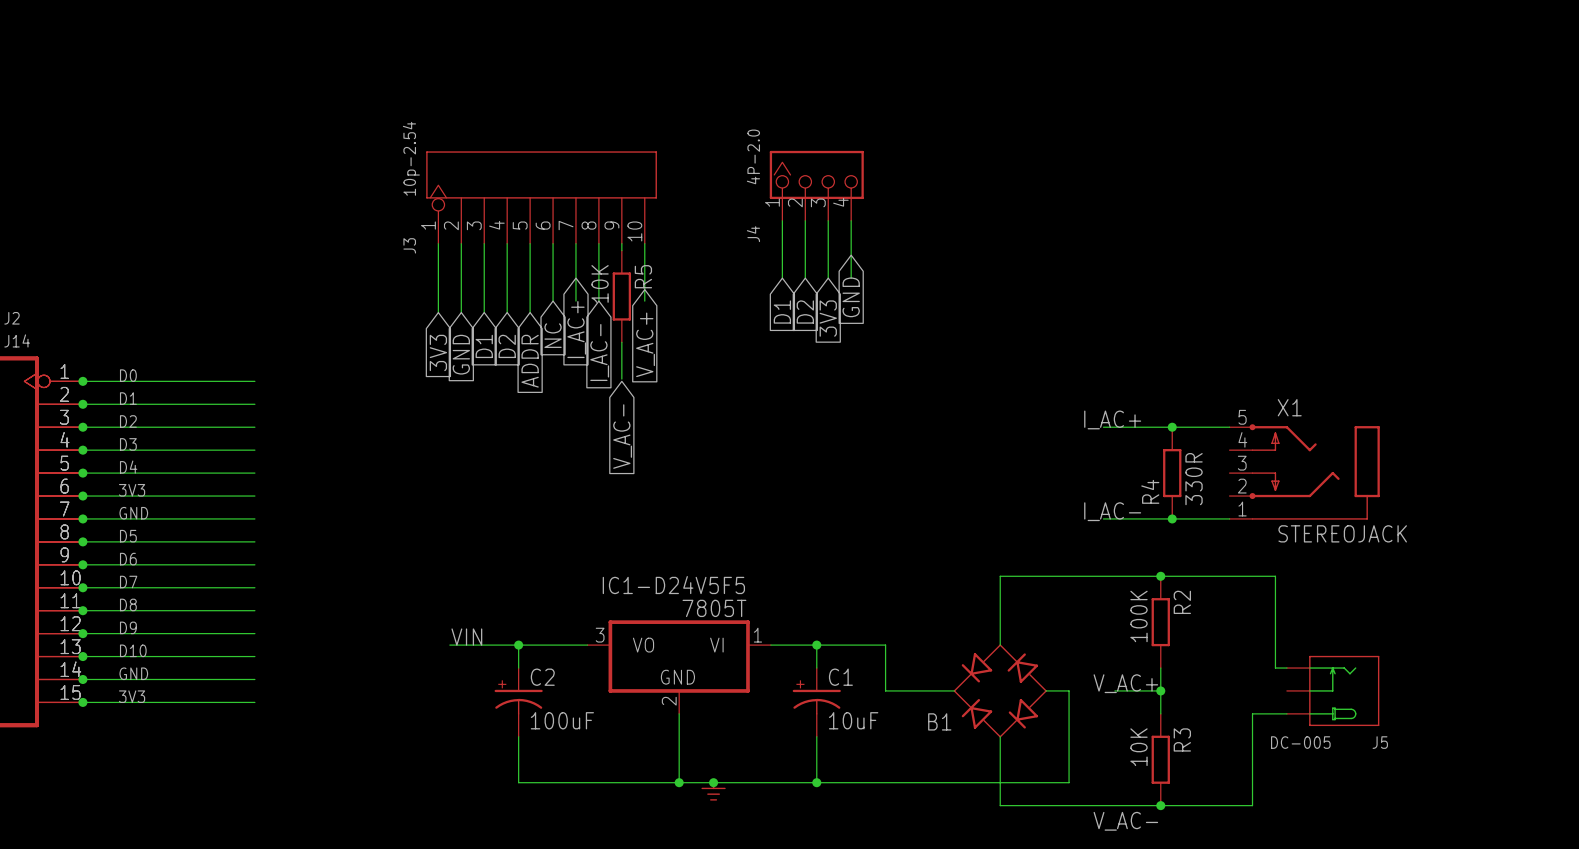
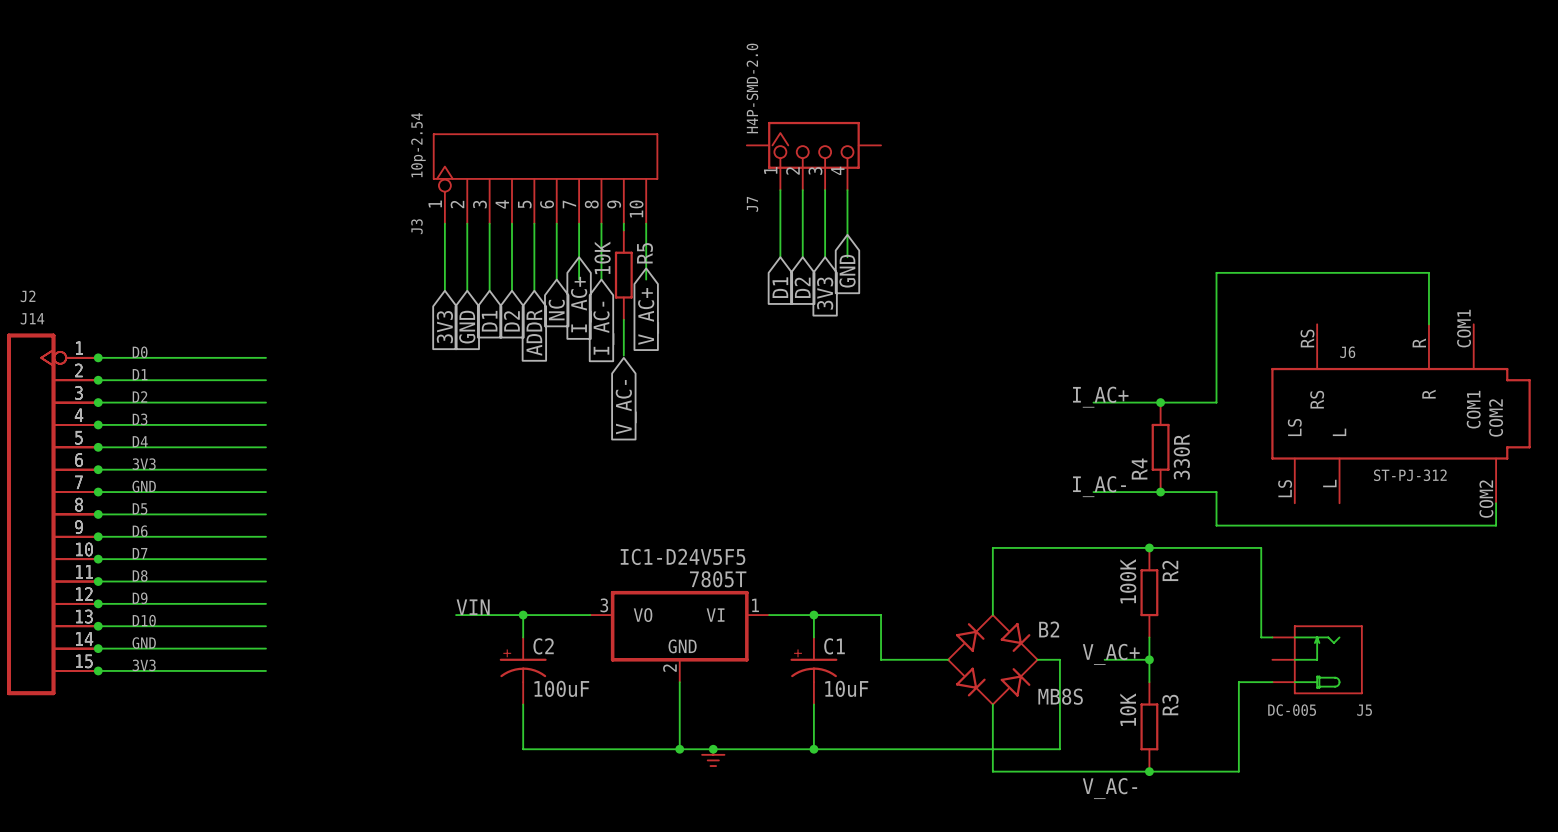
J7: none -> H4P-SMD-2.0 (813, 156)
J4: 4P-2.0 (816, 185) -> none
wire: none -> (1428, 324) (1428, 272) (1216, 272) (1216, 402)
J6: none -> ST-PJ-312 (1401, 413)
X1: STEREOJACK (1304, 471) -> none
wire: none -> (1216, 492) (1216, 525) (1496, 525) (1496, 503)
B1: (1000, 690) -> none
B2: none -> MB8S (992, 659)

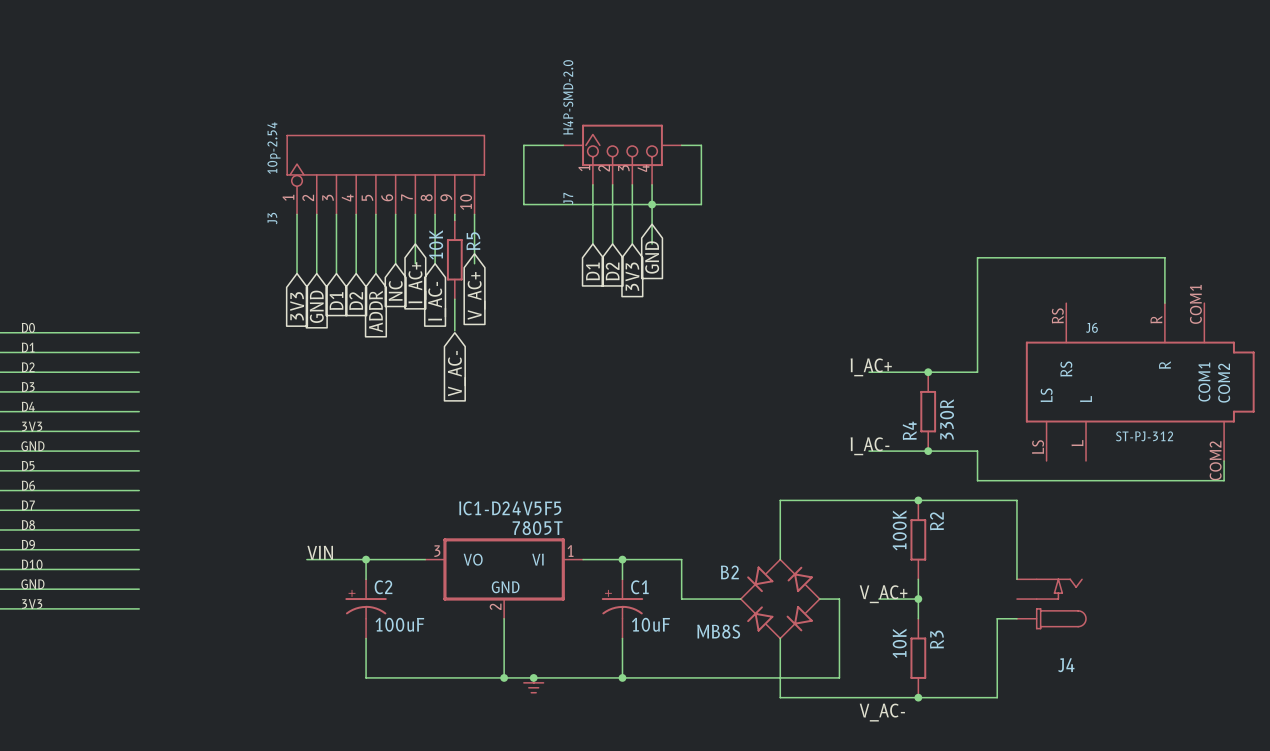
wire: none -> (563, 145) (523, 145) (523, 204) (701, 204) (701, 145) (681, 145)
junction: none -> (652, 204)
B2 flip: as is (992, 659) -> left-right (780, 599)
J5: DC-005 (1317, 659) -> none
J4: none -> (1051, 603)

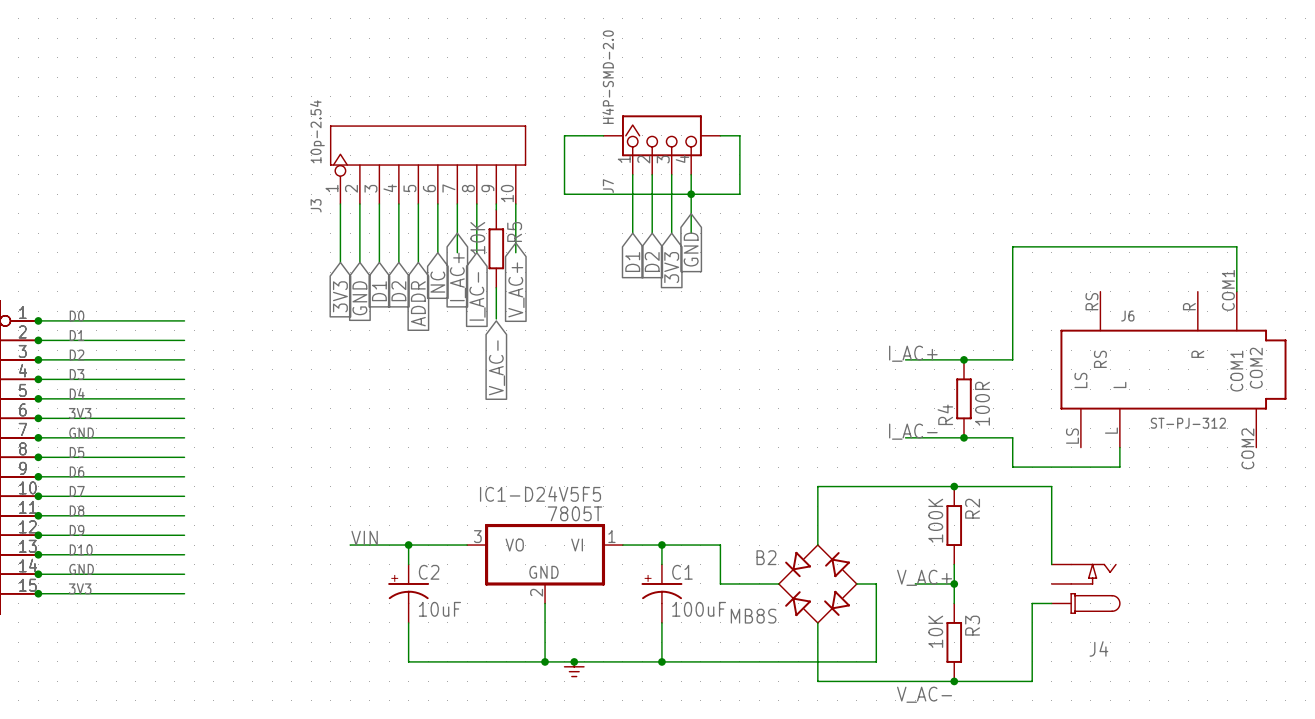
wire: (1164, 257) (1164, 303) -> (1197, 246) (1236, 246) (1236, 291)
R4 value: 330R (947, 419) -> 100R (982, 403)
wire: (1224, 460) (1224, 480) (1086, 480) -> (1119, 447) (1119, 467)
C2 value: 100uF (399, 624) -> 10uF (439, 609)
C1 value: 10uF (650, 624) -> 100uF (699, 609)

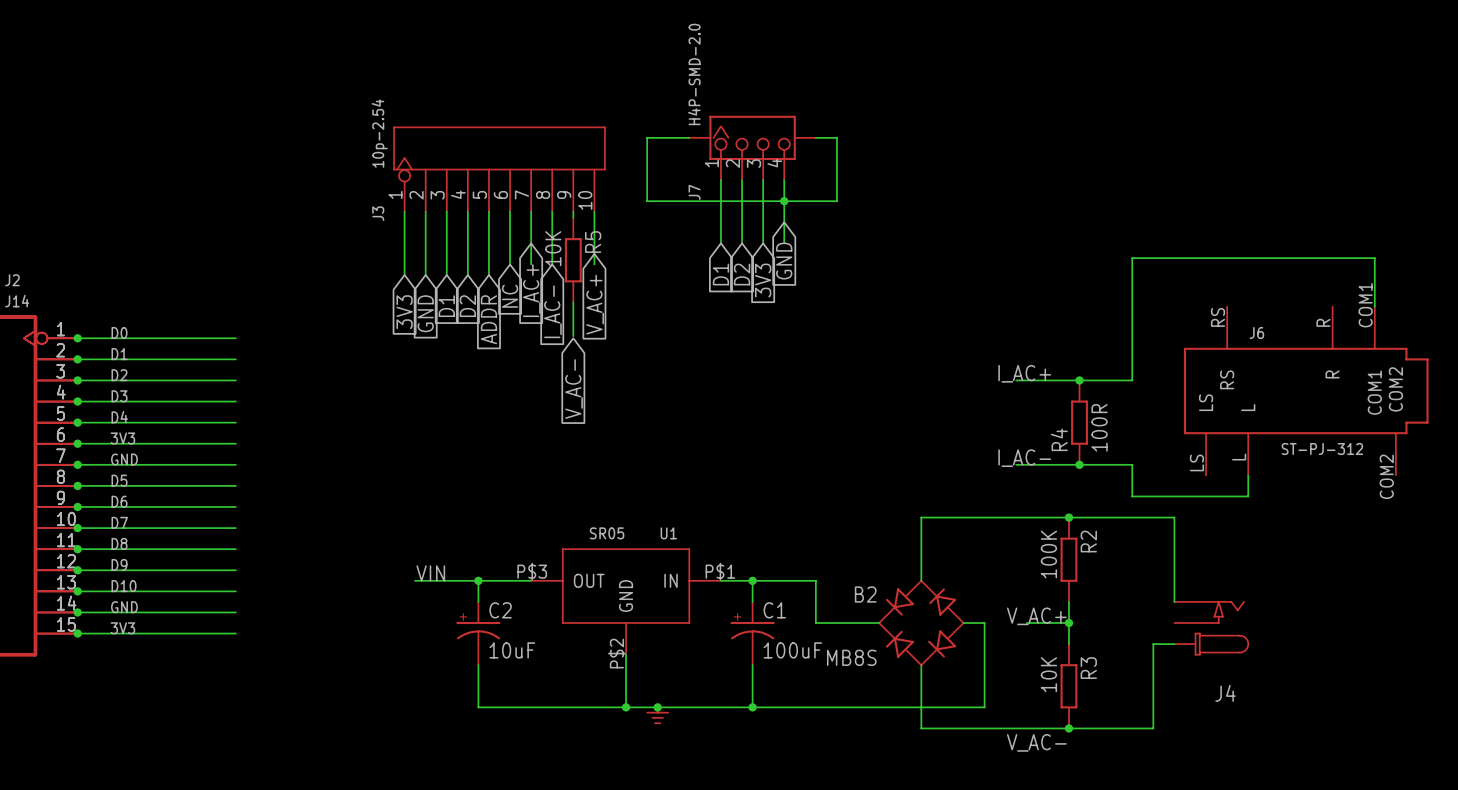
IC1-D24V5F5: 7805T (545, 563) -> none
U1: none -> SR05 (626, 601)

